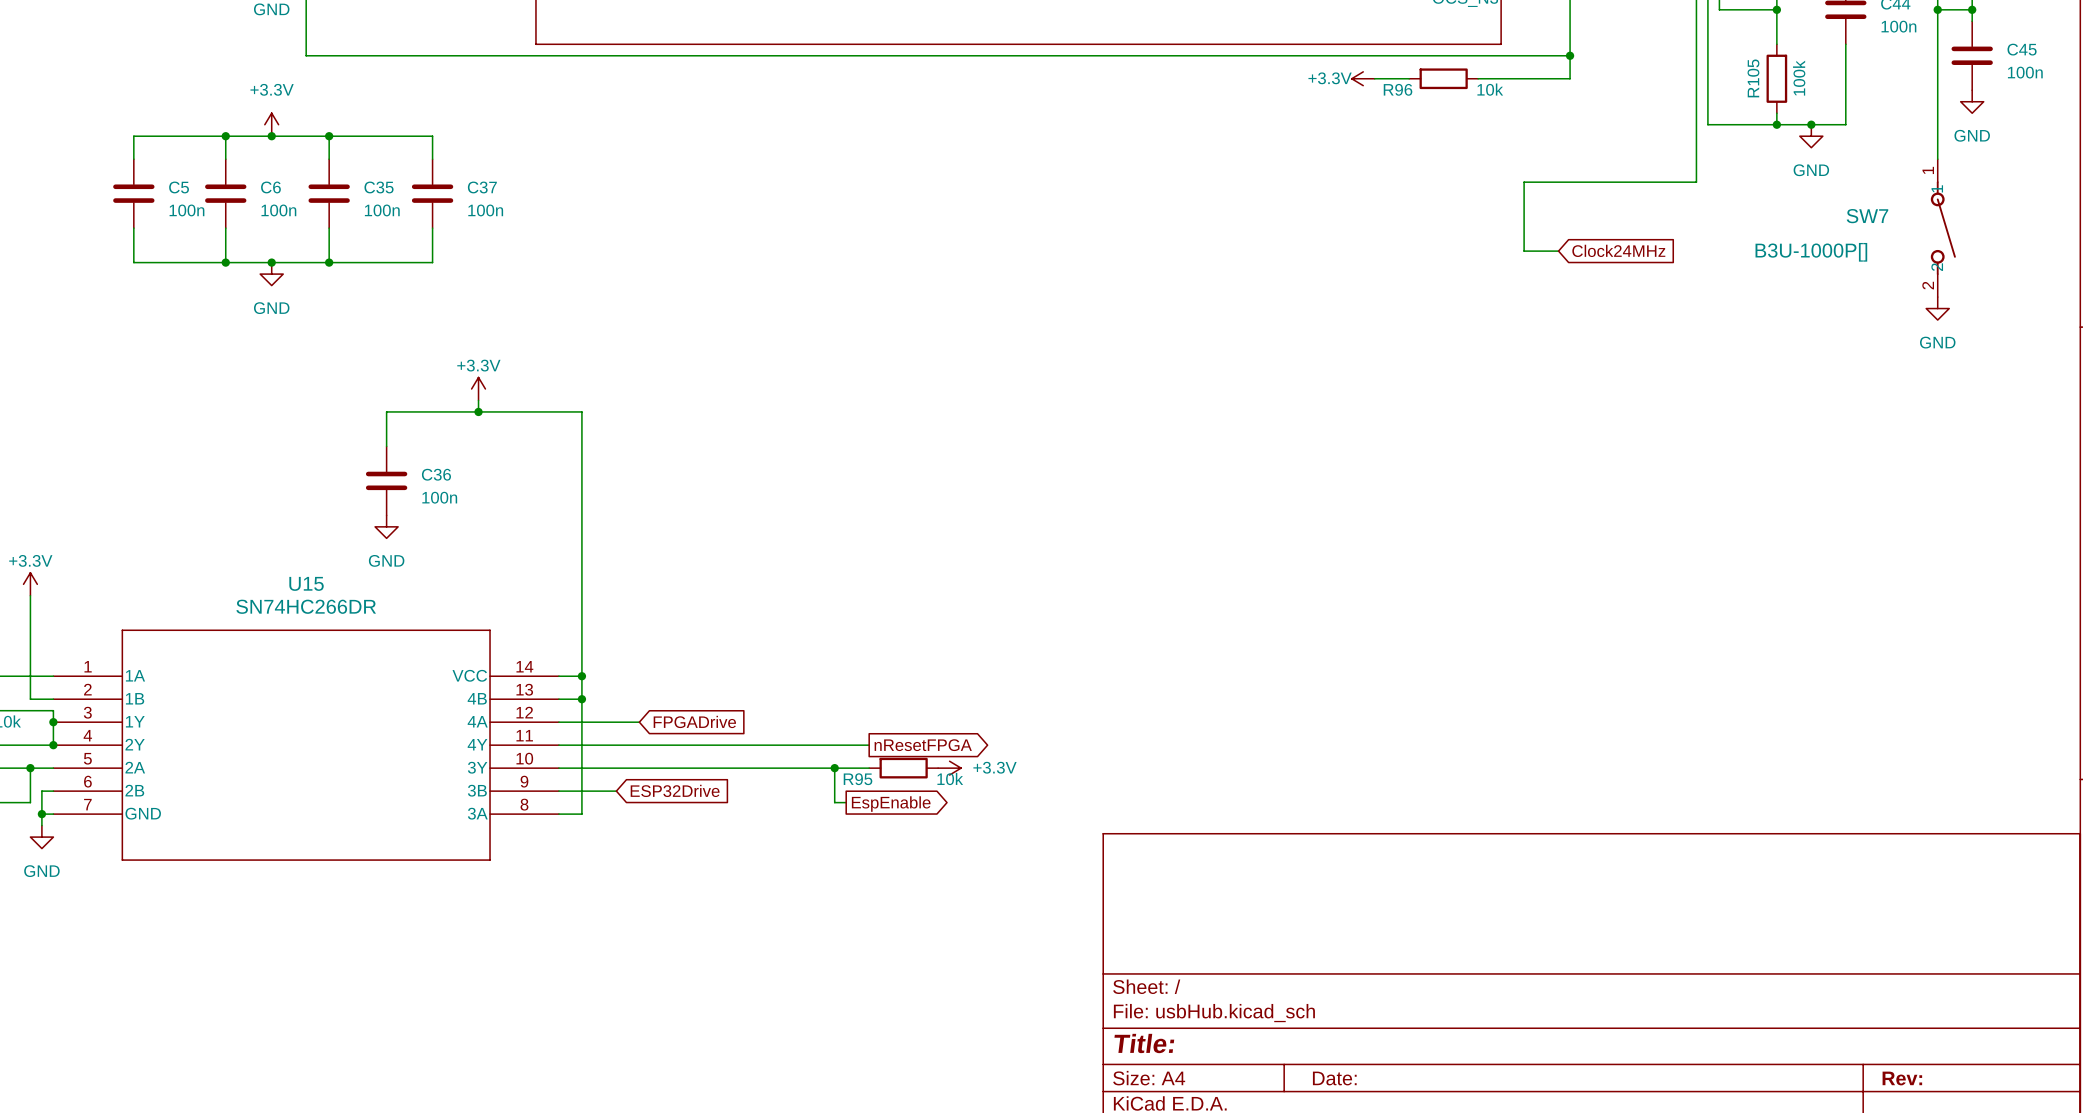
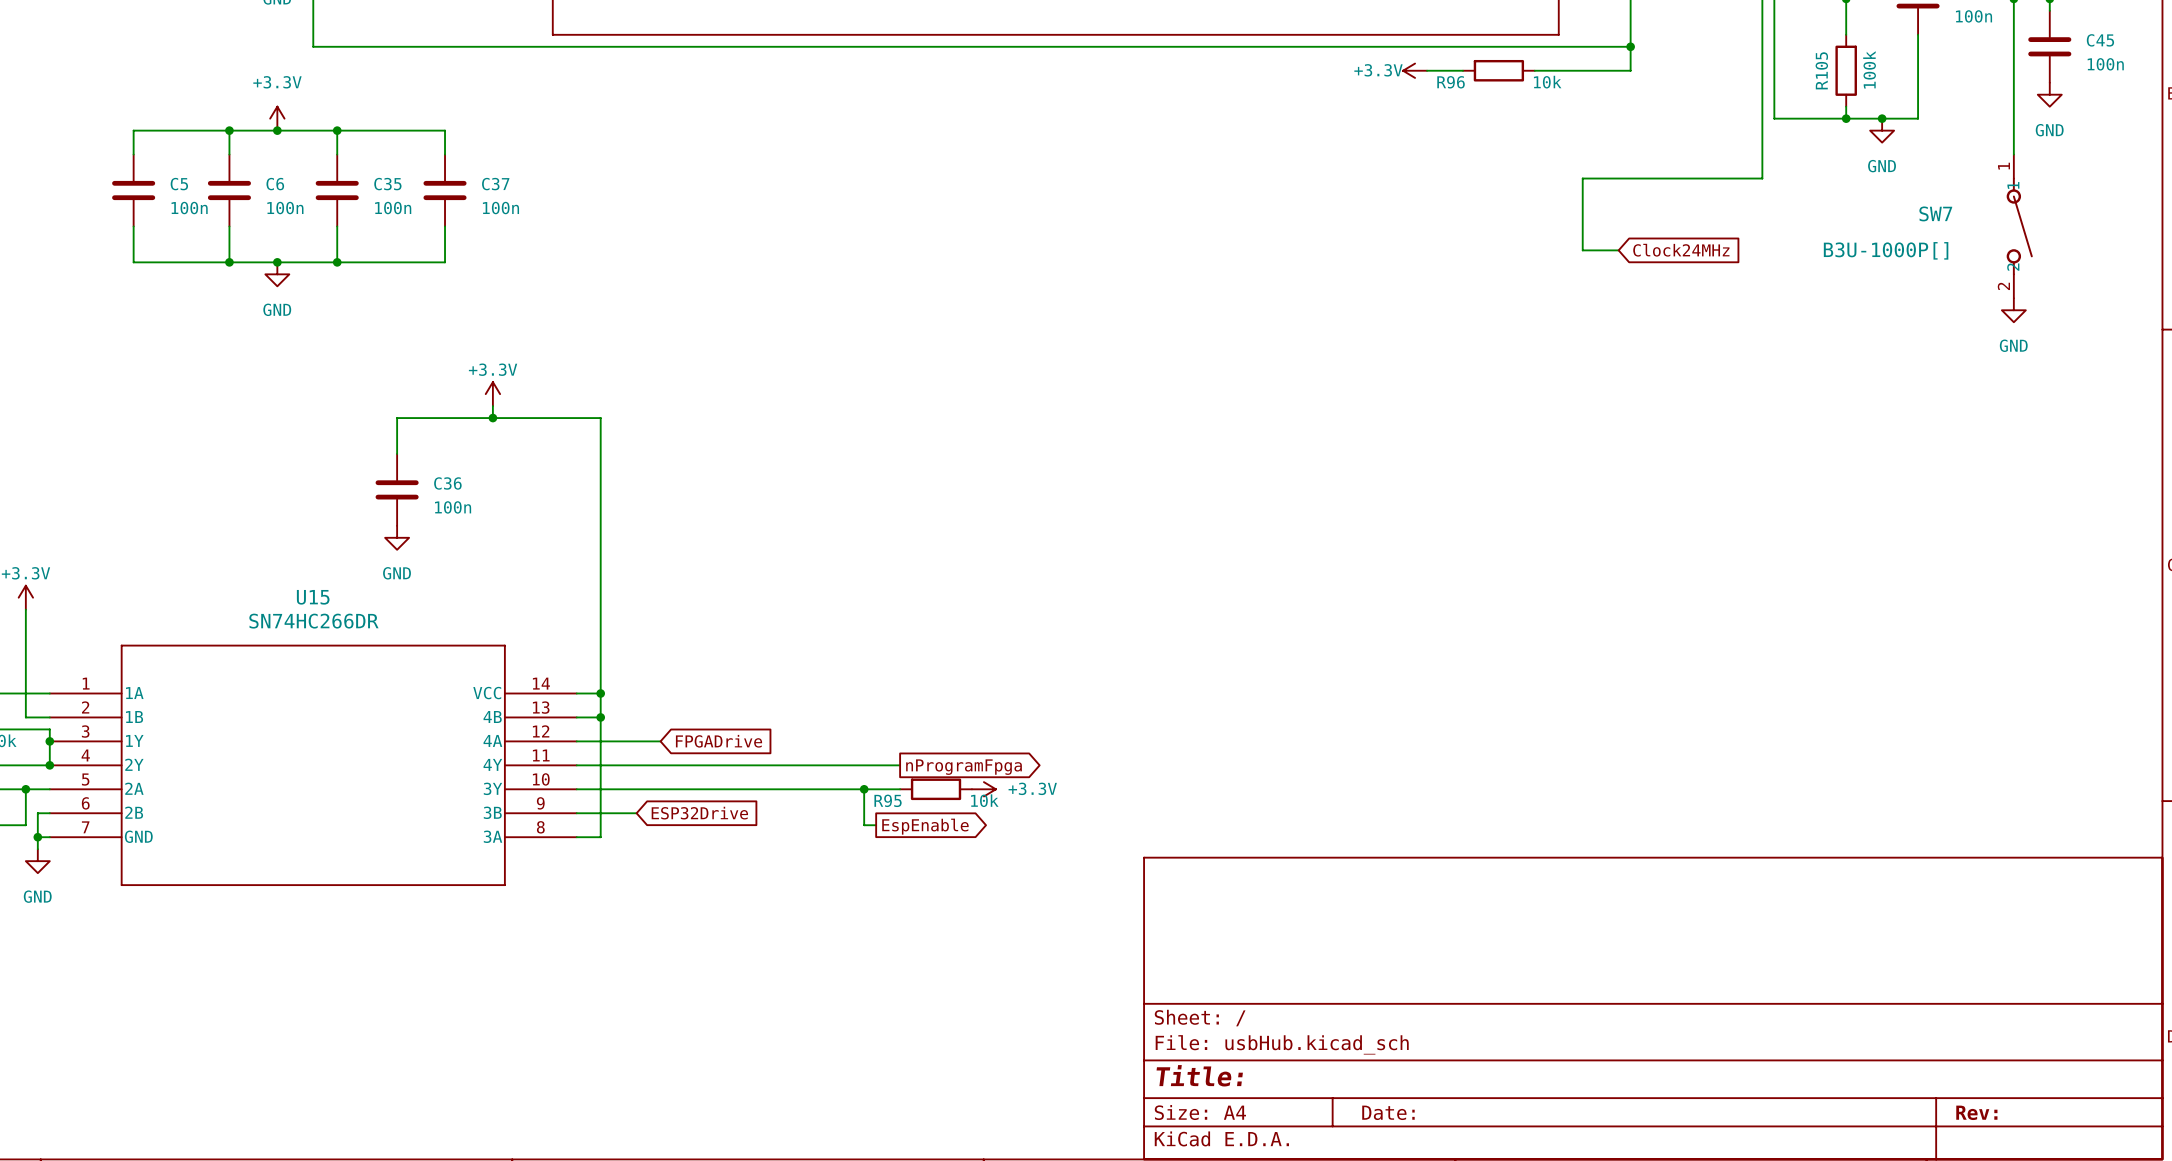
global label: nResetFPGA (923, 745) -> nProgramFpga (964, 767)

